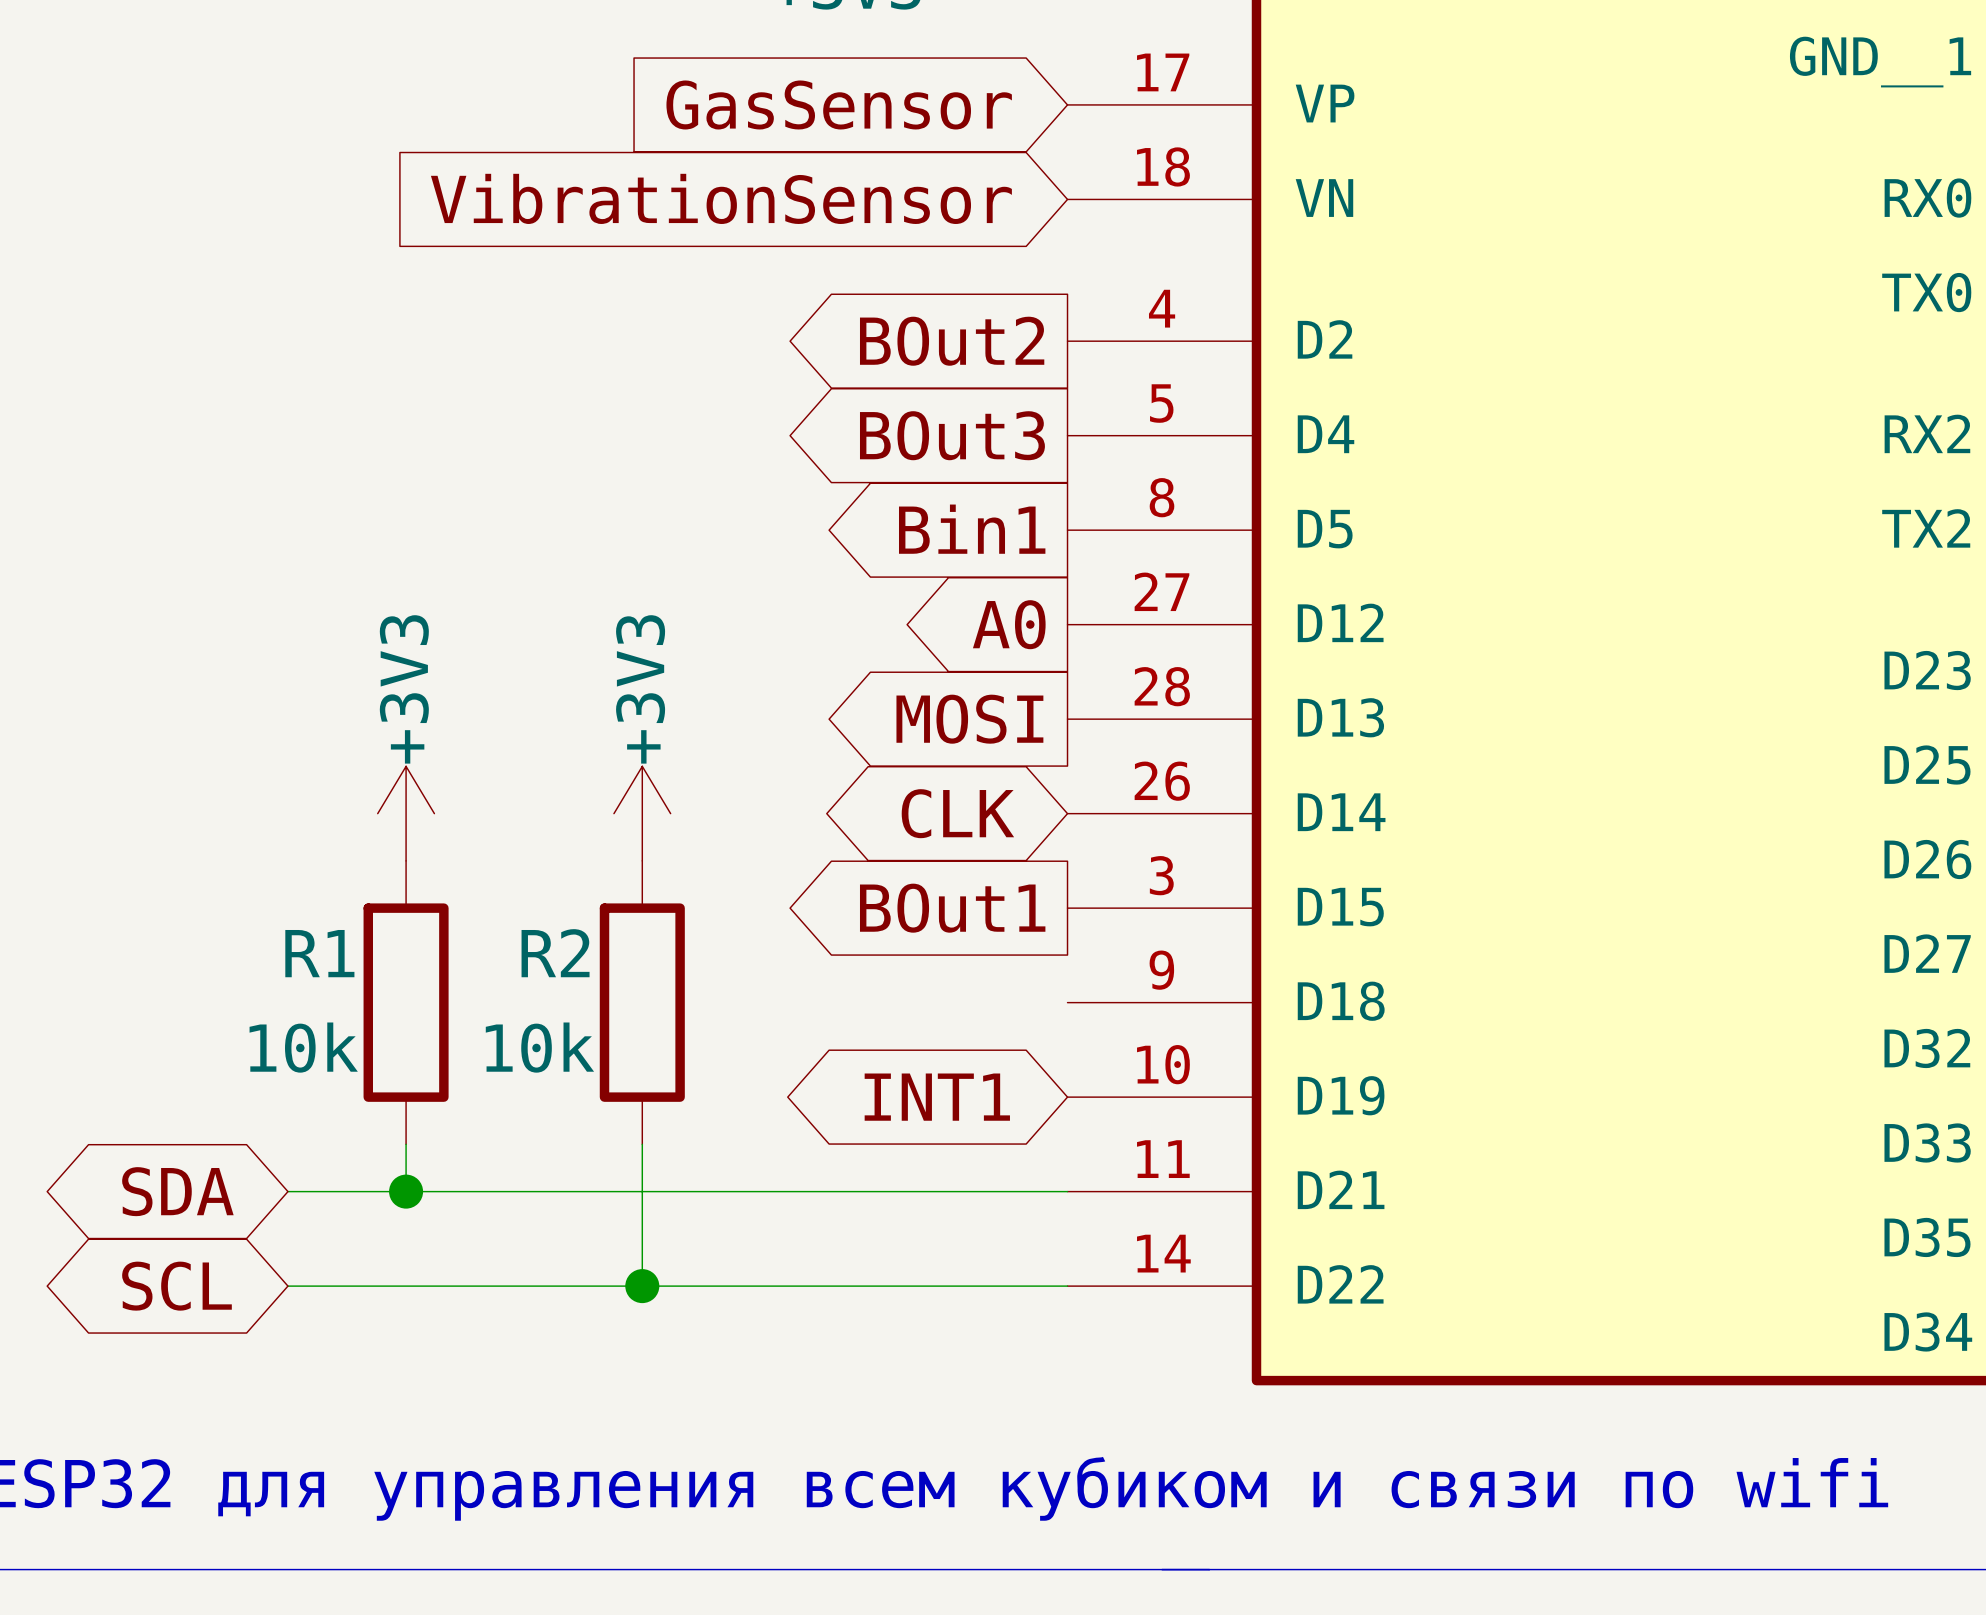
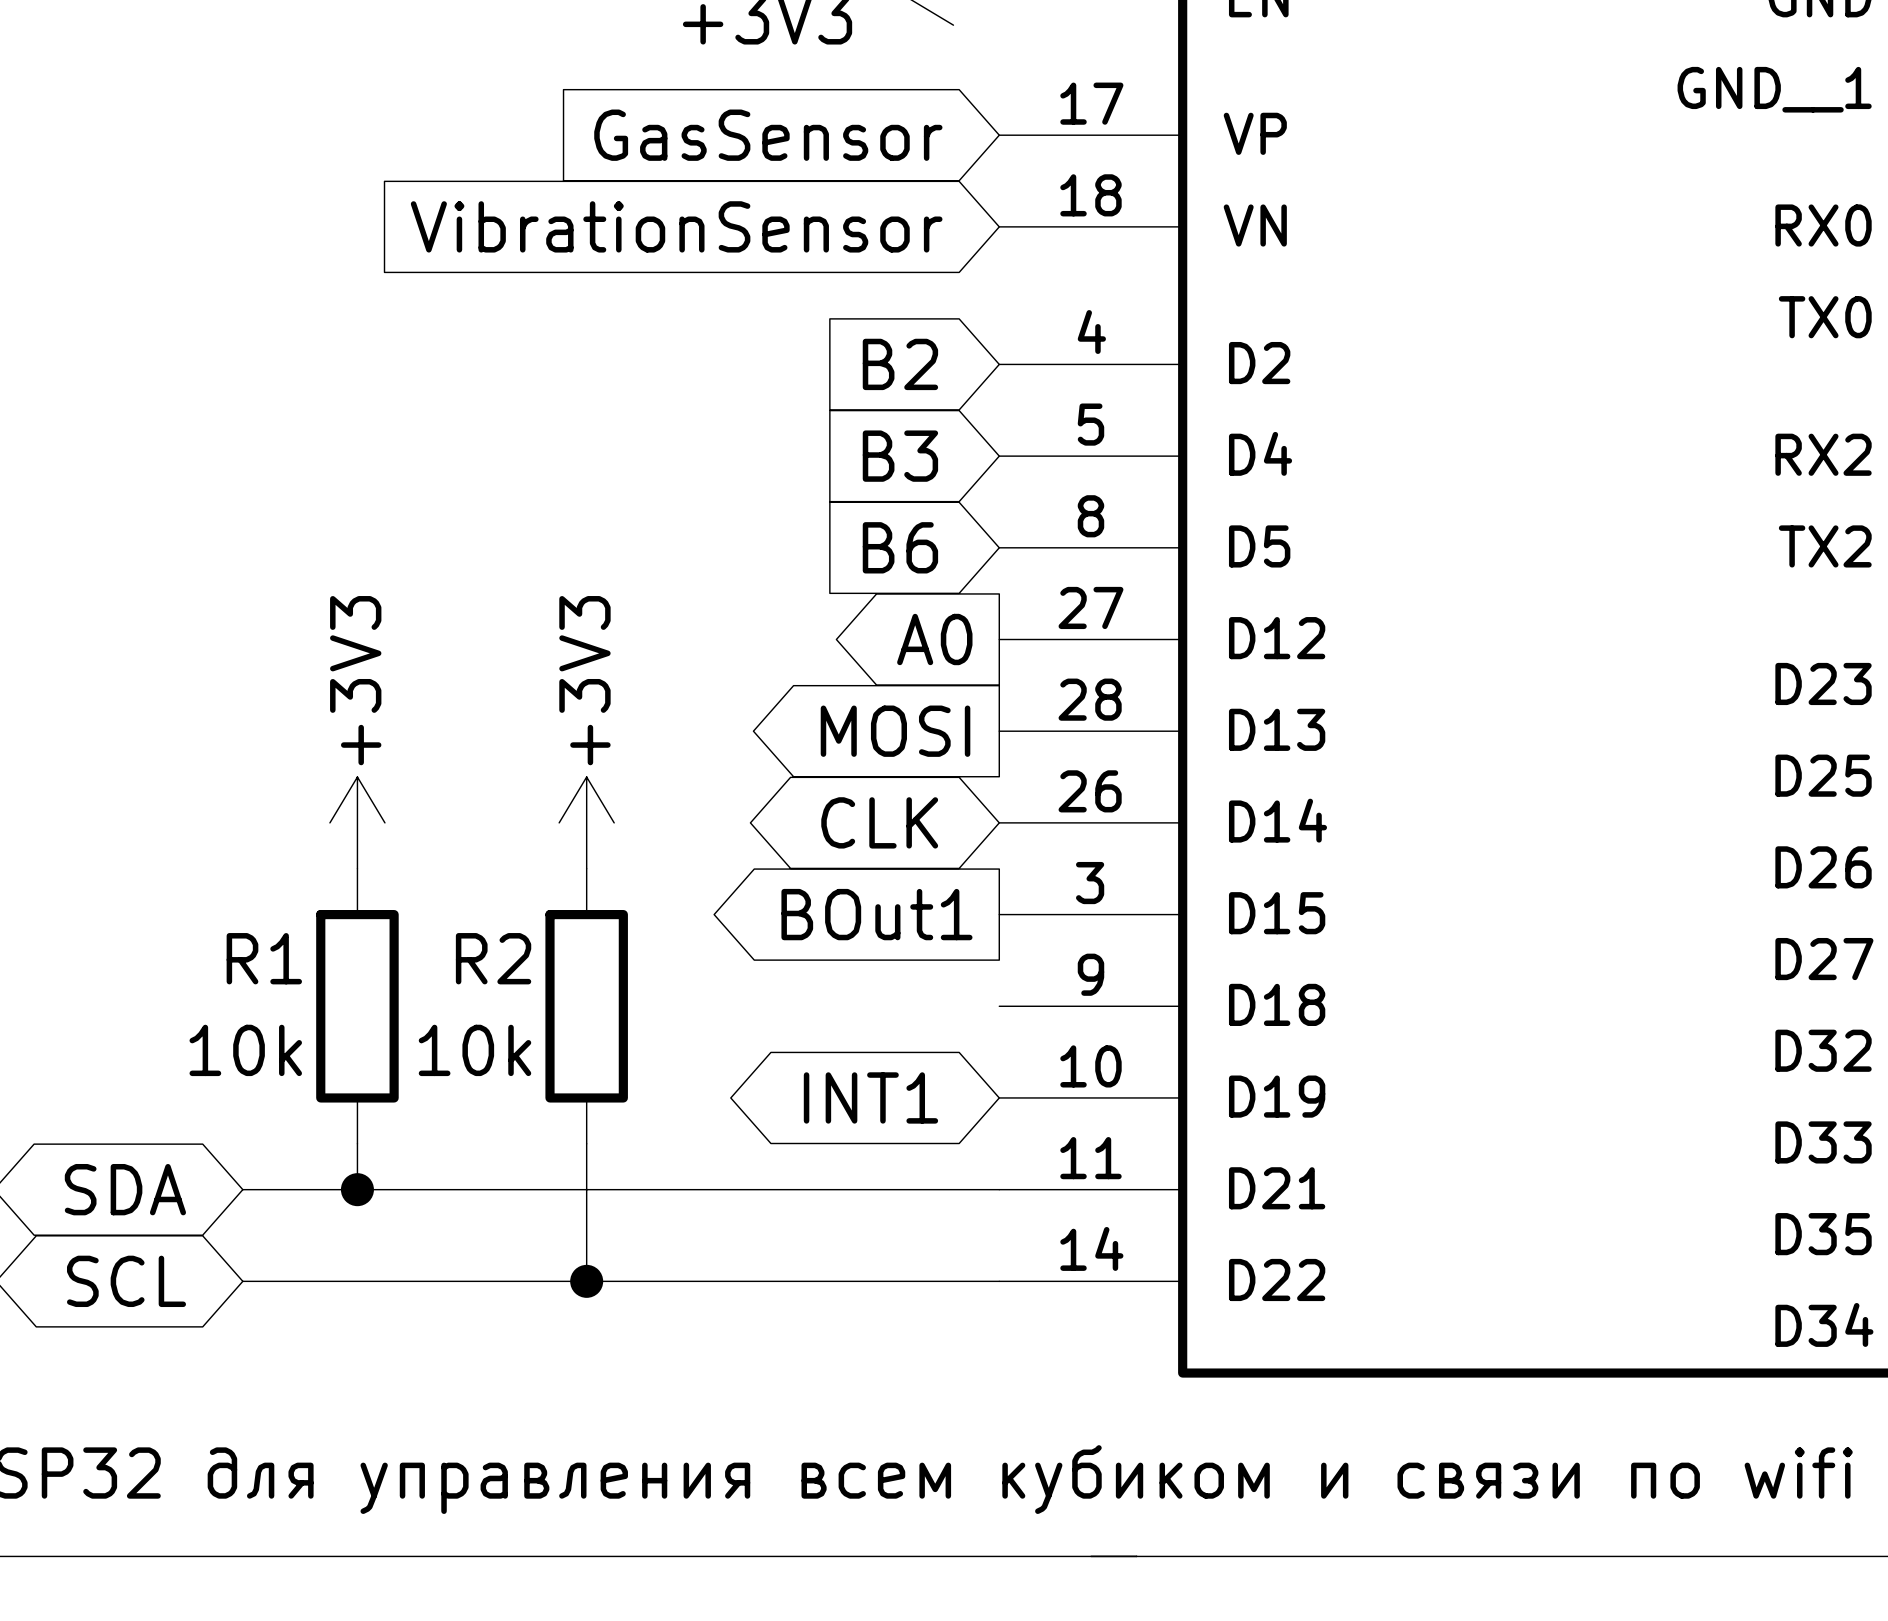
global label shape: output (952, 341) -> input (900, 364)
global label: BOut2 (952, 341) -> B2 (900, 364)
global label shape: output (952, 435) -> input (900, 456)
global label: BOut3 (952, 435) -> B3 (900, 456)
global label shape: output (972, 529) -> input (900, 547)
global label: Bin1 (972, 529) -> B6 (900, 547)

